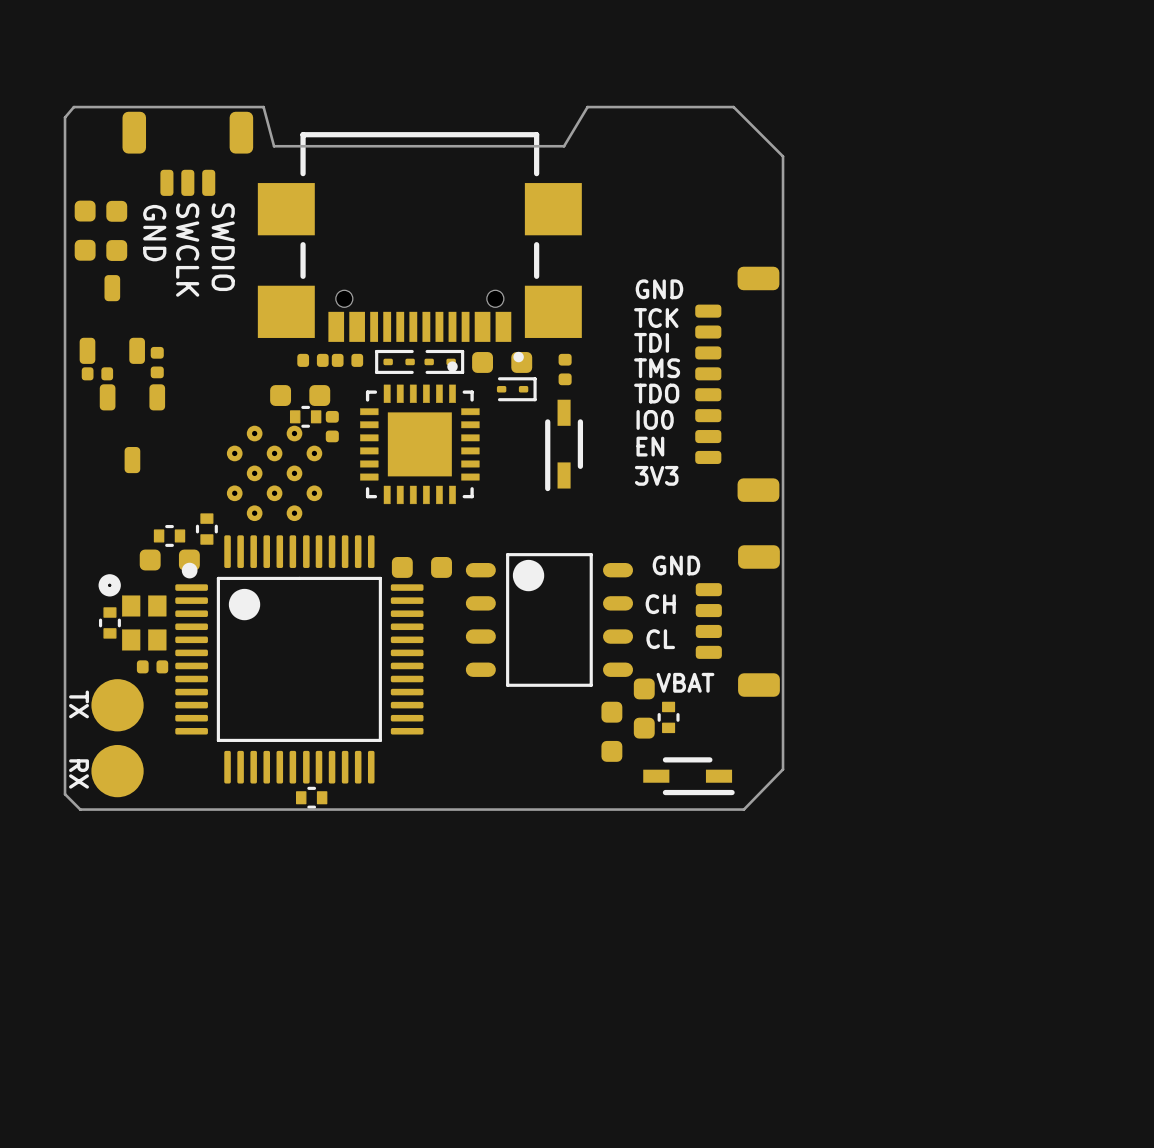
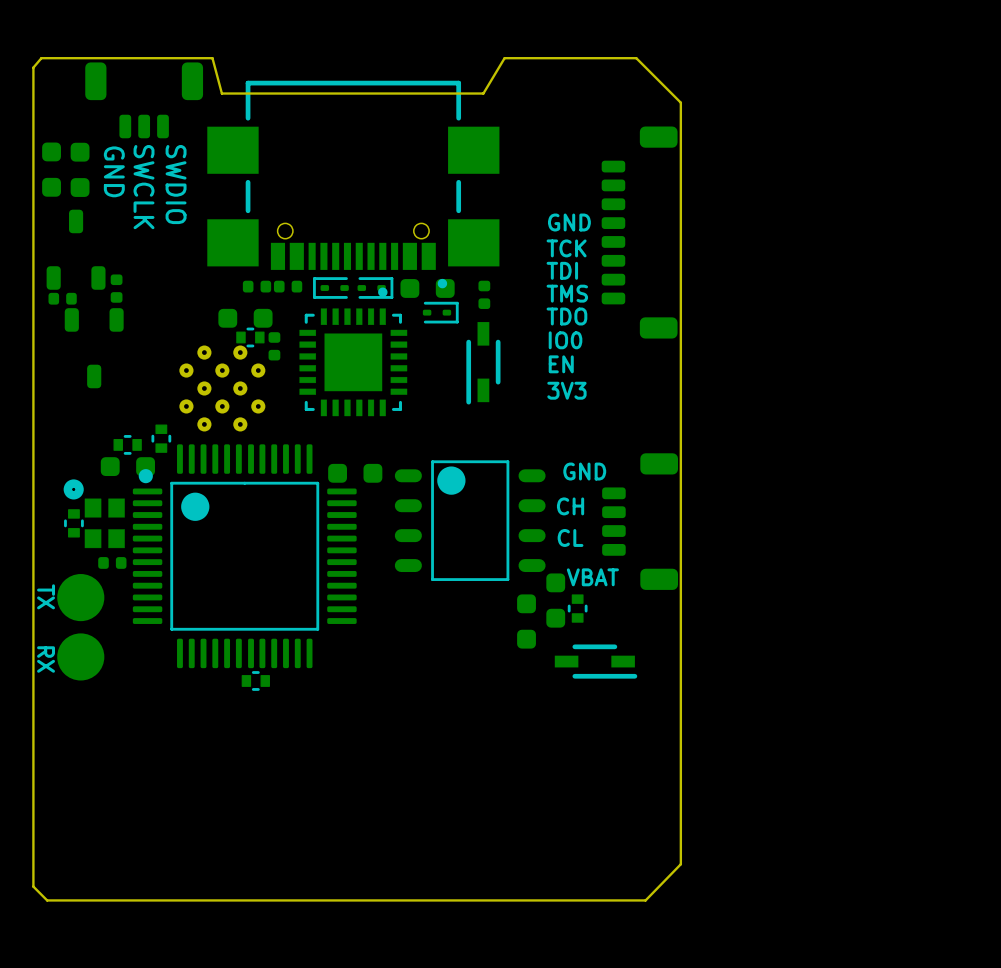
part position: (737, 384) -> (639, 232)
board edge: (783, 769) (743, 809) (80, 809) (65, 794) -> (680, 655) (680, 864) (645, 900) (47, 900) (33, 886) (33, 677)

